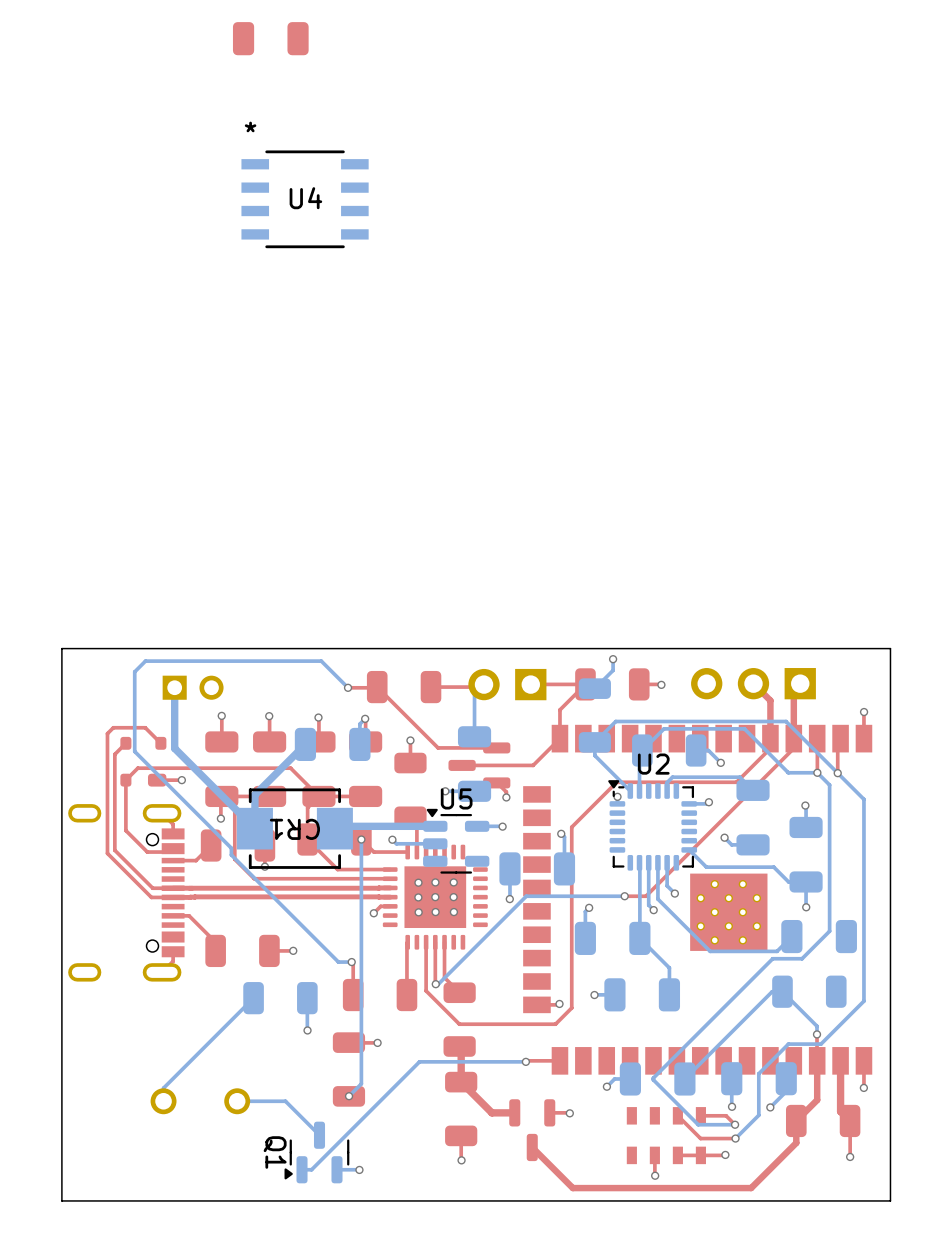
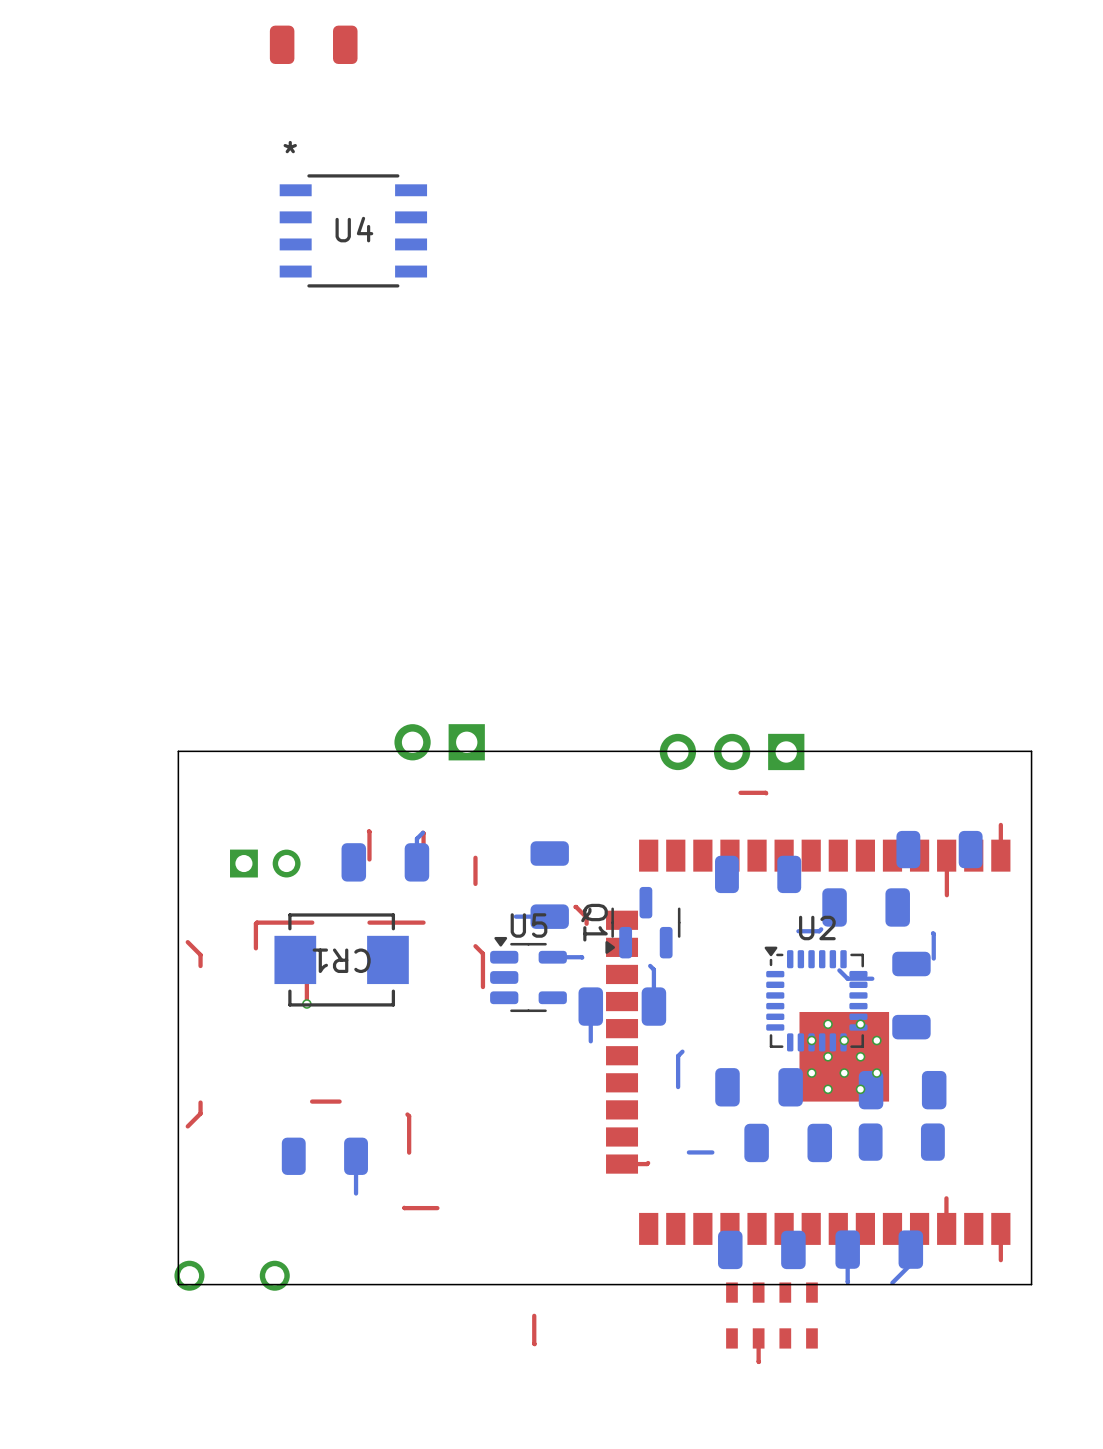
board edge: (153, 648) (61, 648) (61, 1200) (890, 1200) (890, 1108) -> (178, 751) (178, 1284) (1031, 1284)
bottom track: (613, 659) (613, 670) (594, 688) -> none
via: (613, 659) -> none
top track: (753, 683) (770, 700) (770, 748) (736, 782) (616, 782) (571, 827) (571, 1008) (555, 1024) (459, 1024) (426, 990) (426, 942) -> none
part position: (753, 683) -> (732, 751)
top track: (800, 683) (793, 690) (793, 748) (645, 896) (624, 896) -> none
top track: (484, 684) (481, 687) (430, 687) -> none
bottom track: (484, 684) (474, 694) (474, 736) -> none
part position: (507, 684) -> (439, 742)
top track: (530, 684) (585, 684) (559, 709) (559, 738) (533, 765) (462, 765) -> none
part: (612, 684) -> none
via: (661, 684) -> none
bottom track: (174, 687) (174, 748) (254, 828) (254, 794) (305, 744) -> none
part position: (193, 687) -> (265, 863)
top track: (348, 687) (377, 687) (438, 747) (496, 747) -> none
bottom track: (348, 687) (321, 661) (145, 661) (134, 671) (134, 751) (231, 848) (231, 855) (338, 962) (351, 962) -> none
via: (348, 687) -> none
part: (404, 687) -> none
via: (864, 712) -> none
top track: (221, 715) (221, 741) -> none
via: (221, 715) -> none
part: (594, 715) -> none
top track: (269, 716) (269, 741) -> none
via: (269, 716) -> none
via: (318, 717) -> none
via: (365, 718) -> none
part: none -> (939, 849)
top track: (840, 738) (837, 741) (837, 773) -> none
via: (410, 740) -> none
top track: (125, 743) (114, 754) (114, 850) (152, 888) (390, 887) -> none
top track: (160, 743) (145, 727) (113, 727) (107, 733) (107, 853) (151, 897) (390, 897) -> none
part position: (669, 750) -> (758, 874)
bottom track: (696, 750) (708, 750) (720, 762) -> none
part: (143, 761) -> none
via: (720, 762) -> none
part: (479, 765) -> none
part: (221, 769) -> none
part: (269, 769) -> none
part: (318, 769) -> none
part: (365, 769) -> none
via: (817, 772) -> none
via: (837, 773) -> none
top track: (181, 780) (157, 780) -> none
via: (181, 780) -> none
part: none -> (866, 907)
part: (410, 789) -> none
bottom track: (753, 790) (739, 777) (672, 777) (667, 782) (667, 791) -> none
via: (445, 791) -> none
bottom track: (630, 791) (594, 755) (594, 742) (615, 721) (786, 721) (863, 799) (863, 1001) (821, 1044) (788, 1044) (758, 1073) (758, 1115) (735, 1138) -> none
bottom track: (639, 791) (639, 753) (664, 728) (744, 728) (788, 772) (817, 772) (829, 785) (829, 931) (802, 958) (772, 958) (653, 1078) (698, 1124) (735, 1124) -> none
top track: (221, 796) (234, 809) (234, 859) (254, 878) (390, 878) -> none
via: (617, 796) -> none
via: (506, 797) -> none
via: (708, 802) -> none
via: (805, 805) -> none
part: (753, 817) -> none
via: (220, 818) -> none
U2 position: (652, 825) -> (816, 999)
bottom track: (435, 826) (337, 826) (334, 828) -> none
via: (502, 826) -> none
via: (561, 833) -> none
via: (724, 837) -> none
part: (334, 839) -> none
top track: (361, 839) (373, 852) (407, 852) -> none
bottom track: (361, 839) (361, 1083) (349, 1096) -> none
via: (361, 839) -> none
bottom track: (392, 839) (396, 843) (435, 843) -> none
via: (392, 839) -> none
top track: (211, 845) (196, 860) (173, 860) -> none
part: (238, 845) -> none
top track: (173, 848) (169, 852) (147, 852) (125, 830) (125, 780) (137, 768) (290, 768) (318, 796) (307, 807) (307, 839) (337, 869) (390, 869) -> none
bottom track: (689, 849) (706, 867) (773, 867) (788, 881) (806, 881) (806, 907) -> none
part position: (806, 854) -> (911, 995)
bottom track: (639, 862) (639, 938) (669, 967) (669, 994) -> none
bottom track: (648, 862) (648, 905) (653, 910) -> none
bottom track: (657, 862) (657, 899) (710, 951) (777, 951) (791, 936) -> none
bottom track: (667, 862) (667, 885) (674, 893) -> none
via: (418, 882) -> none
via: (435, 882) -> none
via: (453, 882) -> none
part: (126, 892) -> none
via: (674, 893) -> none
bottom track: (624, 896) (526, 896) (438, 984) (435, 984) -> none
via: (624, 896) -> none
via: (418, 897) -> none
part: (435, 897) -> none
via: (435, 897) -> none
via: (453, 897) -> none
via: (509, 899) -> none
top track: (390, 906) (380, 906) (373, 913) -> none
via: (589, 907) -> none
via: (806, 907) -> none
via: (653, 910) -> none
via: (418, 912) -> none
via: (435, 912) -> none
via: (453, 912) -> none
via: (373, 913) -> none
top track: (173, 915) (189, 915) (215, 942) (215, 950) -> none
part position: (819, 936) -> (902, 1090)
part: (612, 938) -> none
part: none -> (759, 1087)
top track: (407, 942) (406, 995) -> none
top track: (435, 942) (435, 984) -> none
top track: (444, 942) (444, 977) (459, 992) -> none
part: (242, 950) -> none
via: (293, 950) -> none
via: (351, 962) -> none
via: (435, 984) -> none
part: none -> (788, 1142)
part position: (809, 991) -> (901, 1142)
part: (642, 994) -> none
part: (380, 995) -> none
via: (594, 995) -> none
bottom track: (253, 998) (163, 1088) (163, 1101) -> none
via: (559, 1003) -> none
part: (459, 1019) -> none
via: (307, 1030) -> none
bottom track: (817, 1034) (817, 1026) (782, 991) (772, 991) (684, 1078) -> none
via: (817, 1034) -> none
via: (377, 1042) -> none
top track: (459, 1046) (461, 1082) (491, 1112) (514, 1112) -> none
top track: (559, 1060) (525, 1061) -> none
top track: (817, 1060) (817, 1100) (796, 1120) (796, 1142) (751, 1188) (572, 1188) (532, 1147) -> none
top track: (840, 1060) (840, 1111) (850, 1120) -> none
bottom track: (525, 1061) (419, 1061) (311, 1169) (302, 1169) -> none
via: (525, 1061) -> none
part: (348, 1069) -> none
bottom track: (630, 1078) (614, 1078) (606, 1086) -> none
via: (606, 1086) -> none
via: (863, 1087) -> none
via: (349, 1096) -> none
bottom track: (237, 1101) (285, 1101) (319, 1135) -> none
via: (732, 1106) -> none
via: (770, 1107) -> none
part: (461, 1108) -> none
top track: (549, 1112) (569, 1113) -> none
via: (569, 1113) -> none
top track: (677, 1115) (700, 1138) (735, 1138) -> none
top track: (700, 1115) (726, 1115) (735, 1124) -> none
part: (823, 1120) -> none
top track: (850, 1121) (850, 1156) -> none
via: (735, 1124) -> none
part: (532, 1130) -> none
via: (735, 1138) -> none
Q1 position: (316, 1152) -> (642, 922)
top track: (725, 1154) (677, 1155) -> none
via: (725, 1154) -> none
via: (850, 1156) -> none
via: (461, 1160) -> none
bottom track: (359, 1169) (336, 1169) -> none
via: (359, 1169) -> none
via: (655, 1175) -> none

